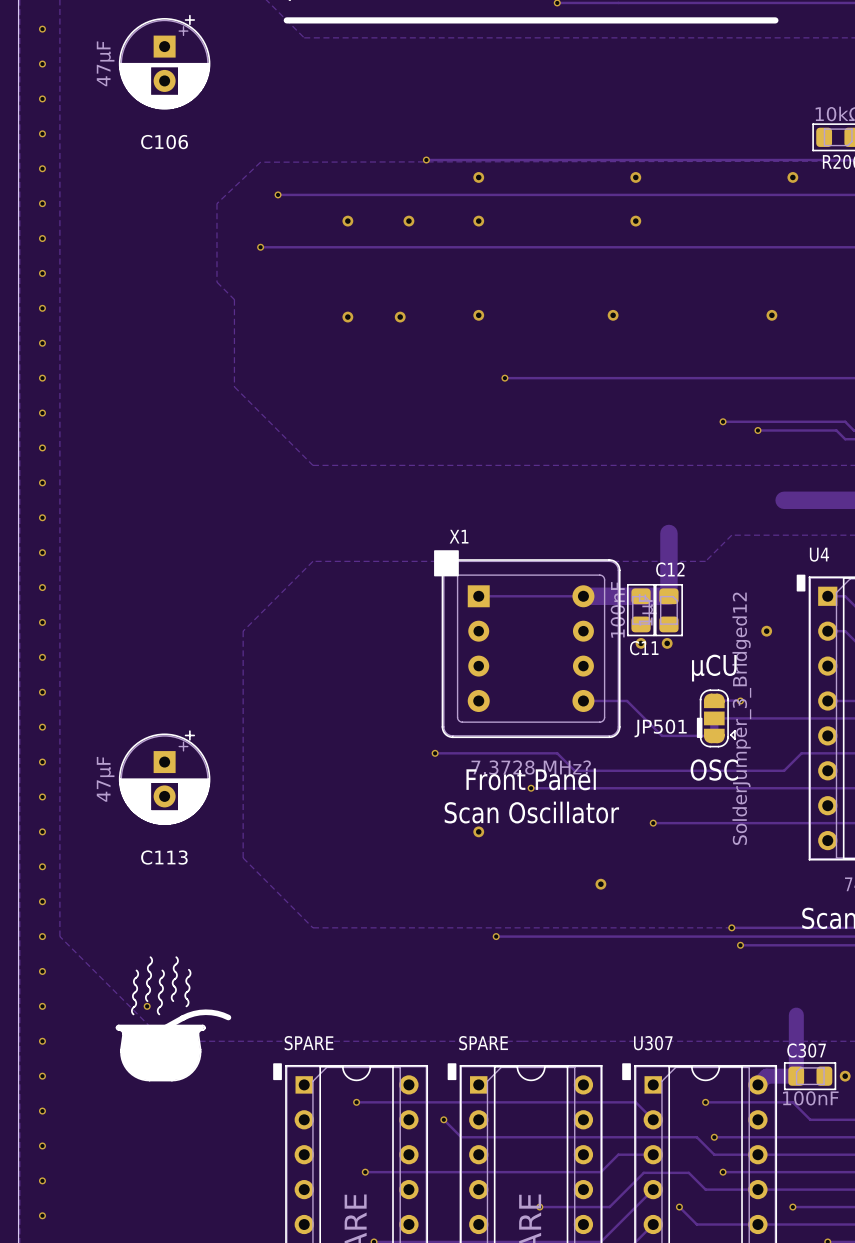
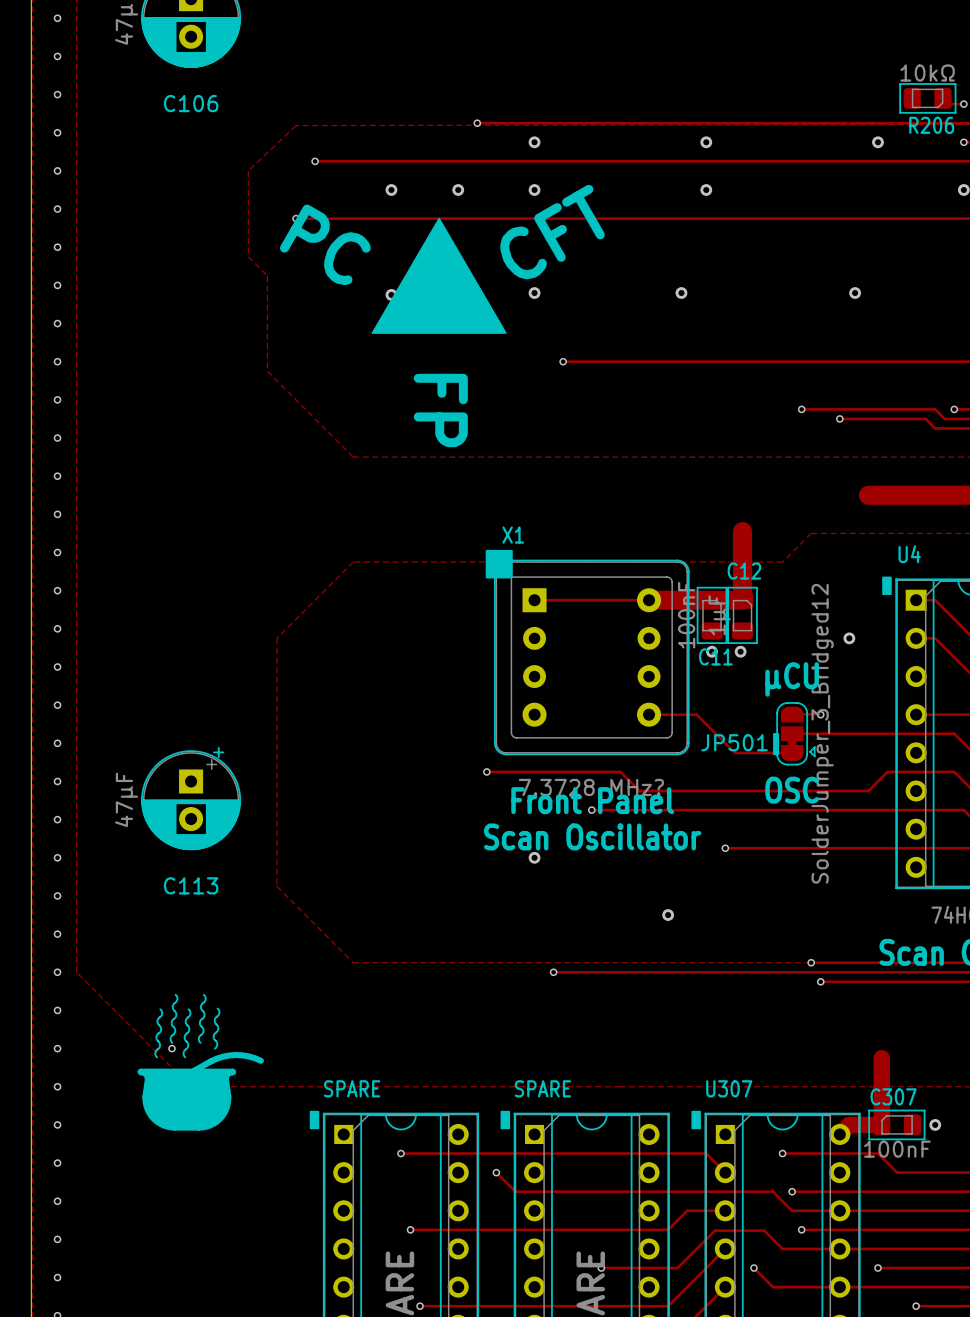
drawing: none -> [371, 217, 507, 334]
text: none -> CFT (552, 232)
text: none -> PC (325, 244)
text: none -> FP (440, 410)

